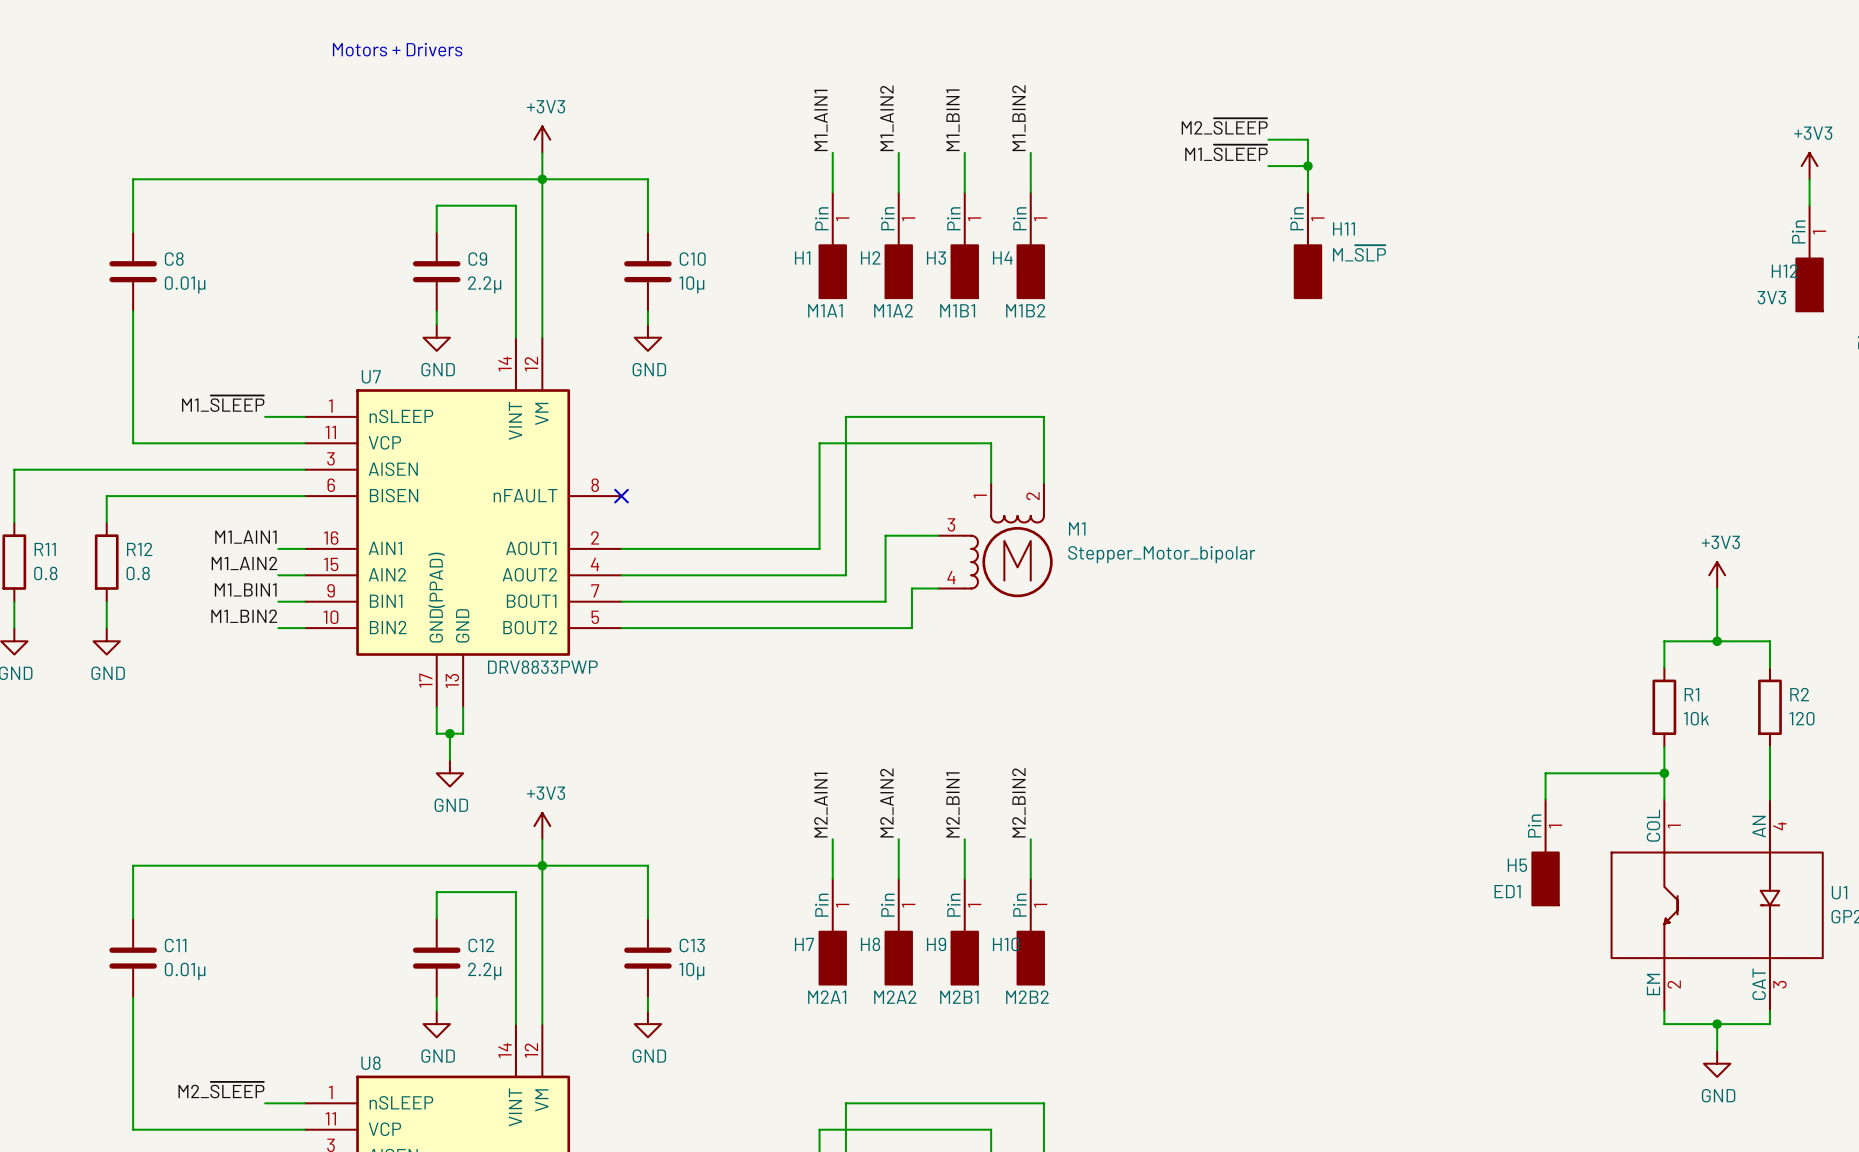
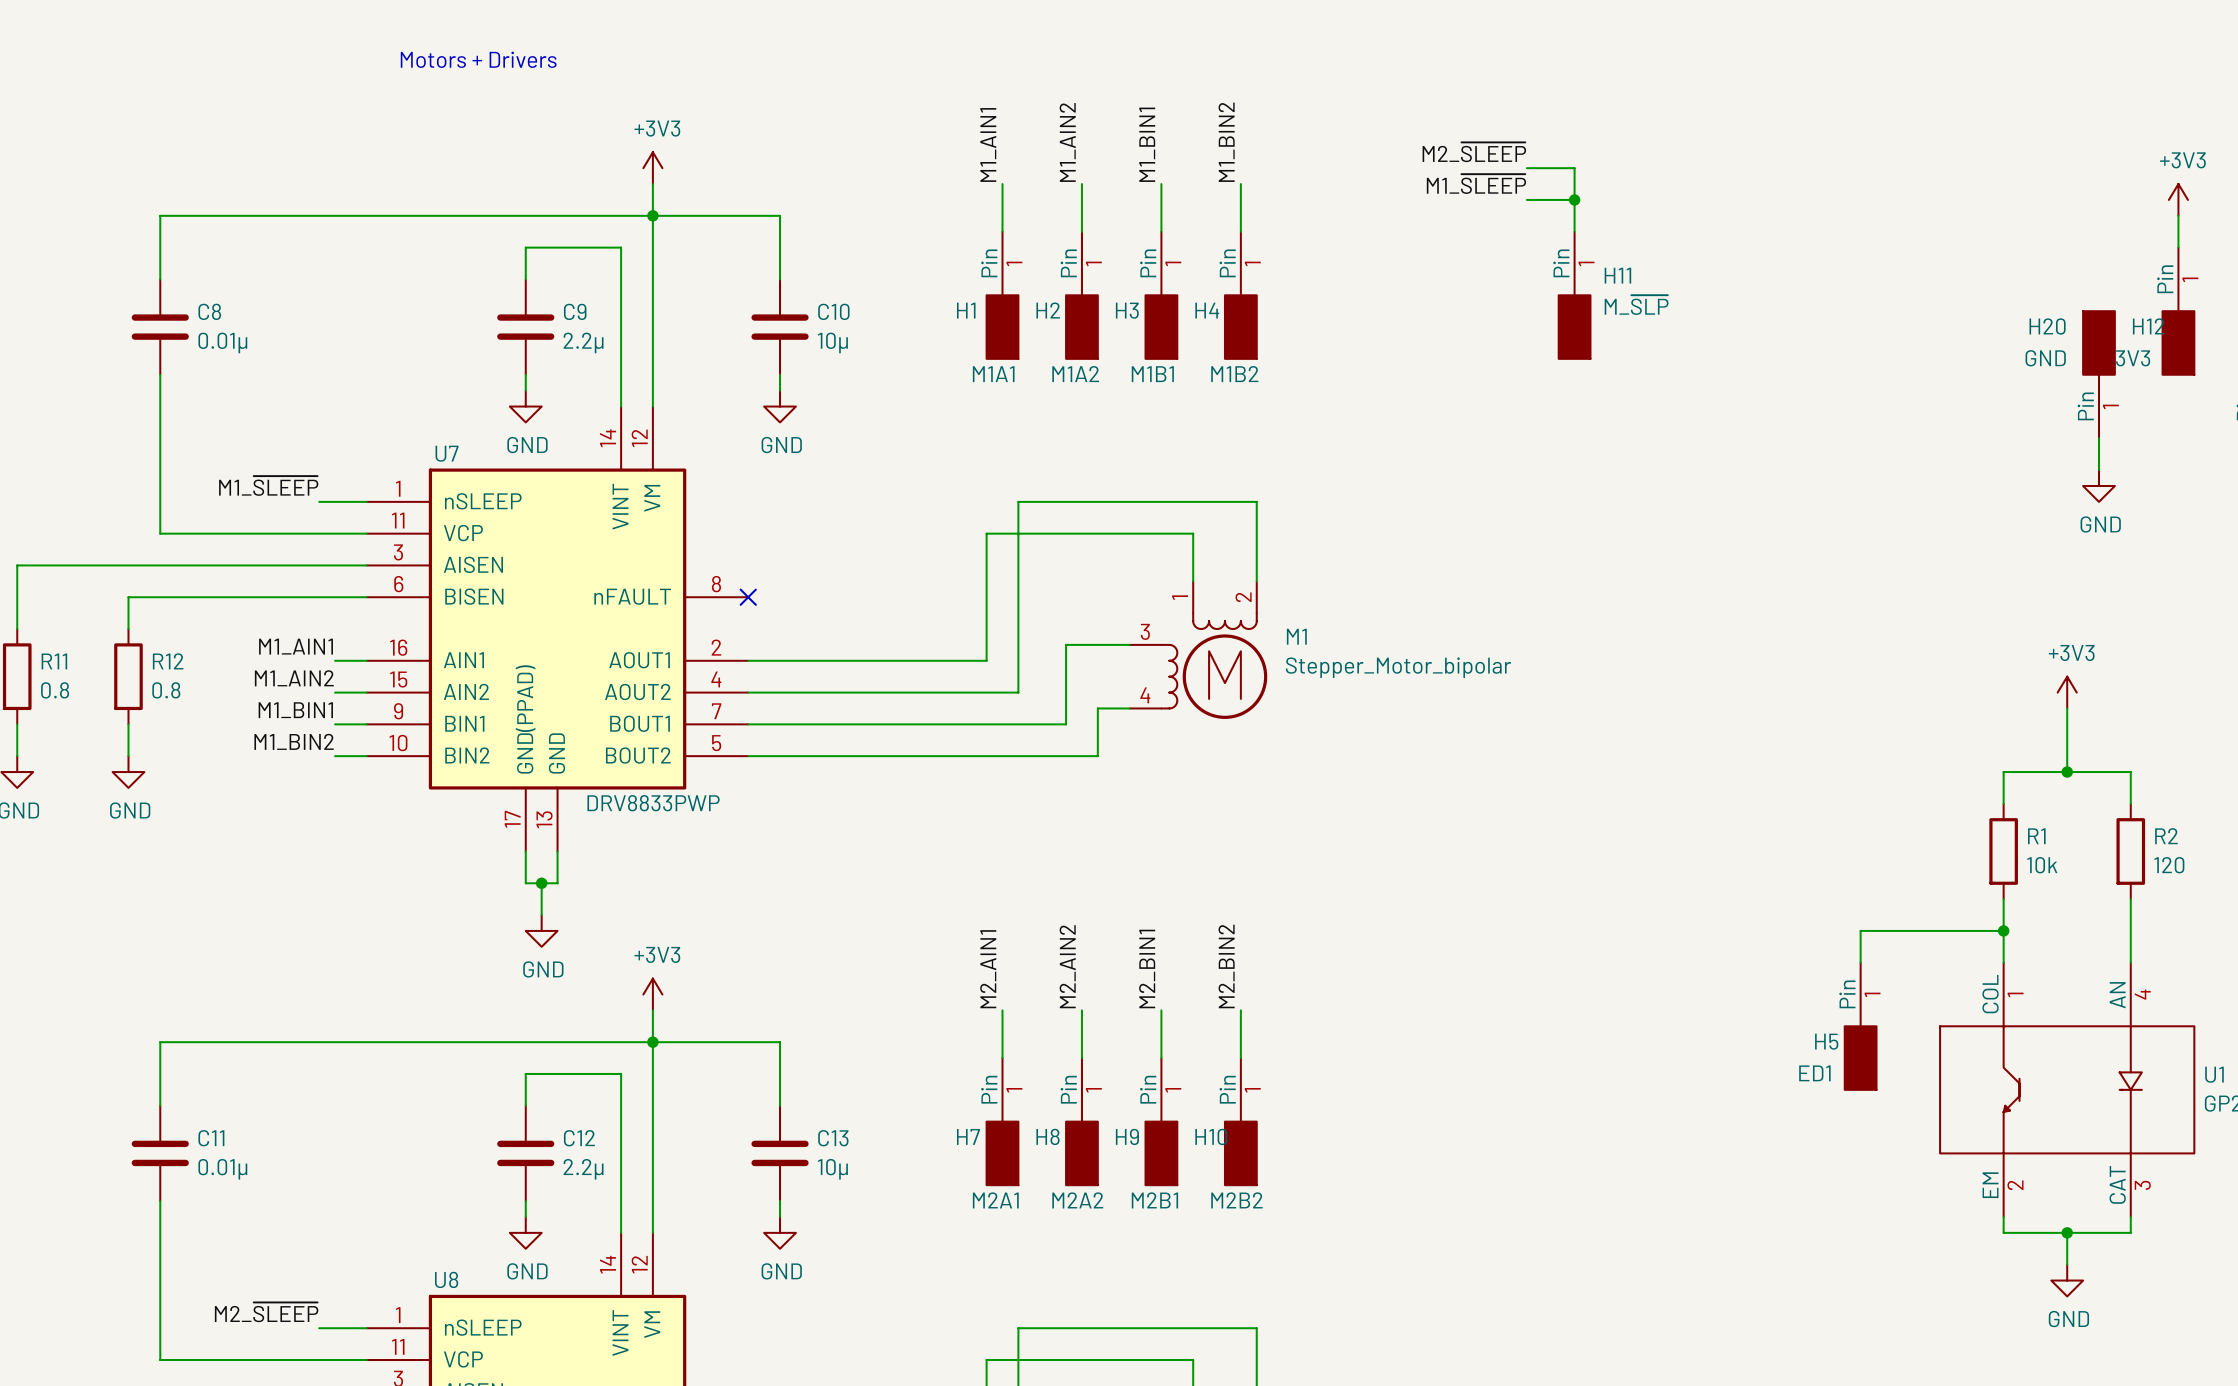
H20: none -> GND (2098, 374)
wire: none -> (2098, 438) (2098, 470)
power symbol: none -> GND (2098, 485)

